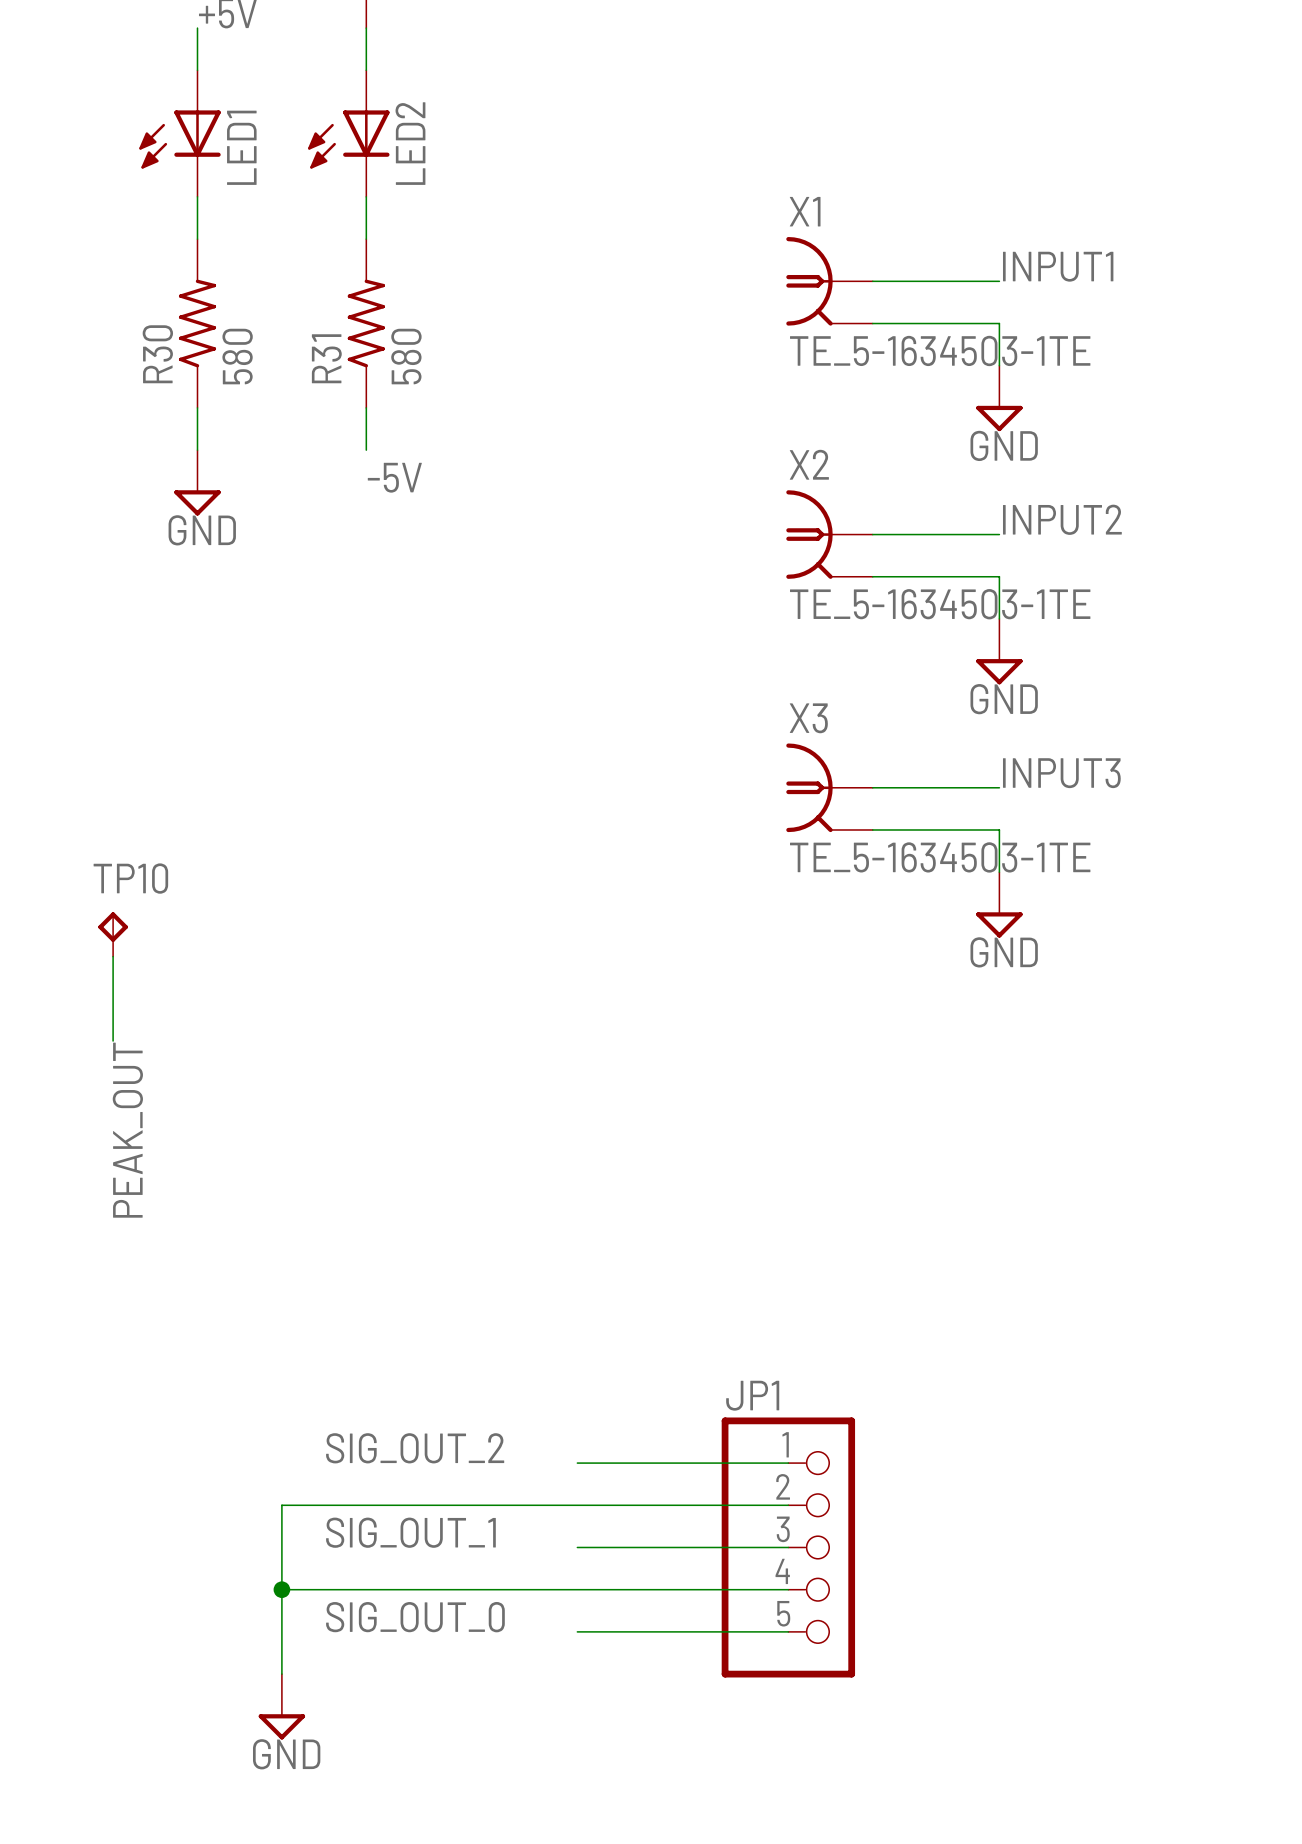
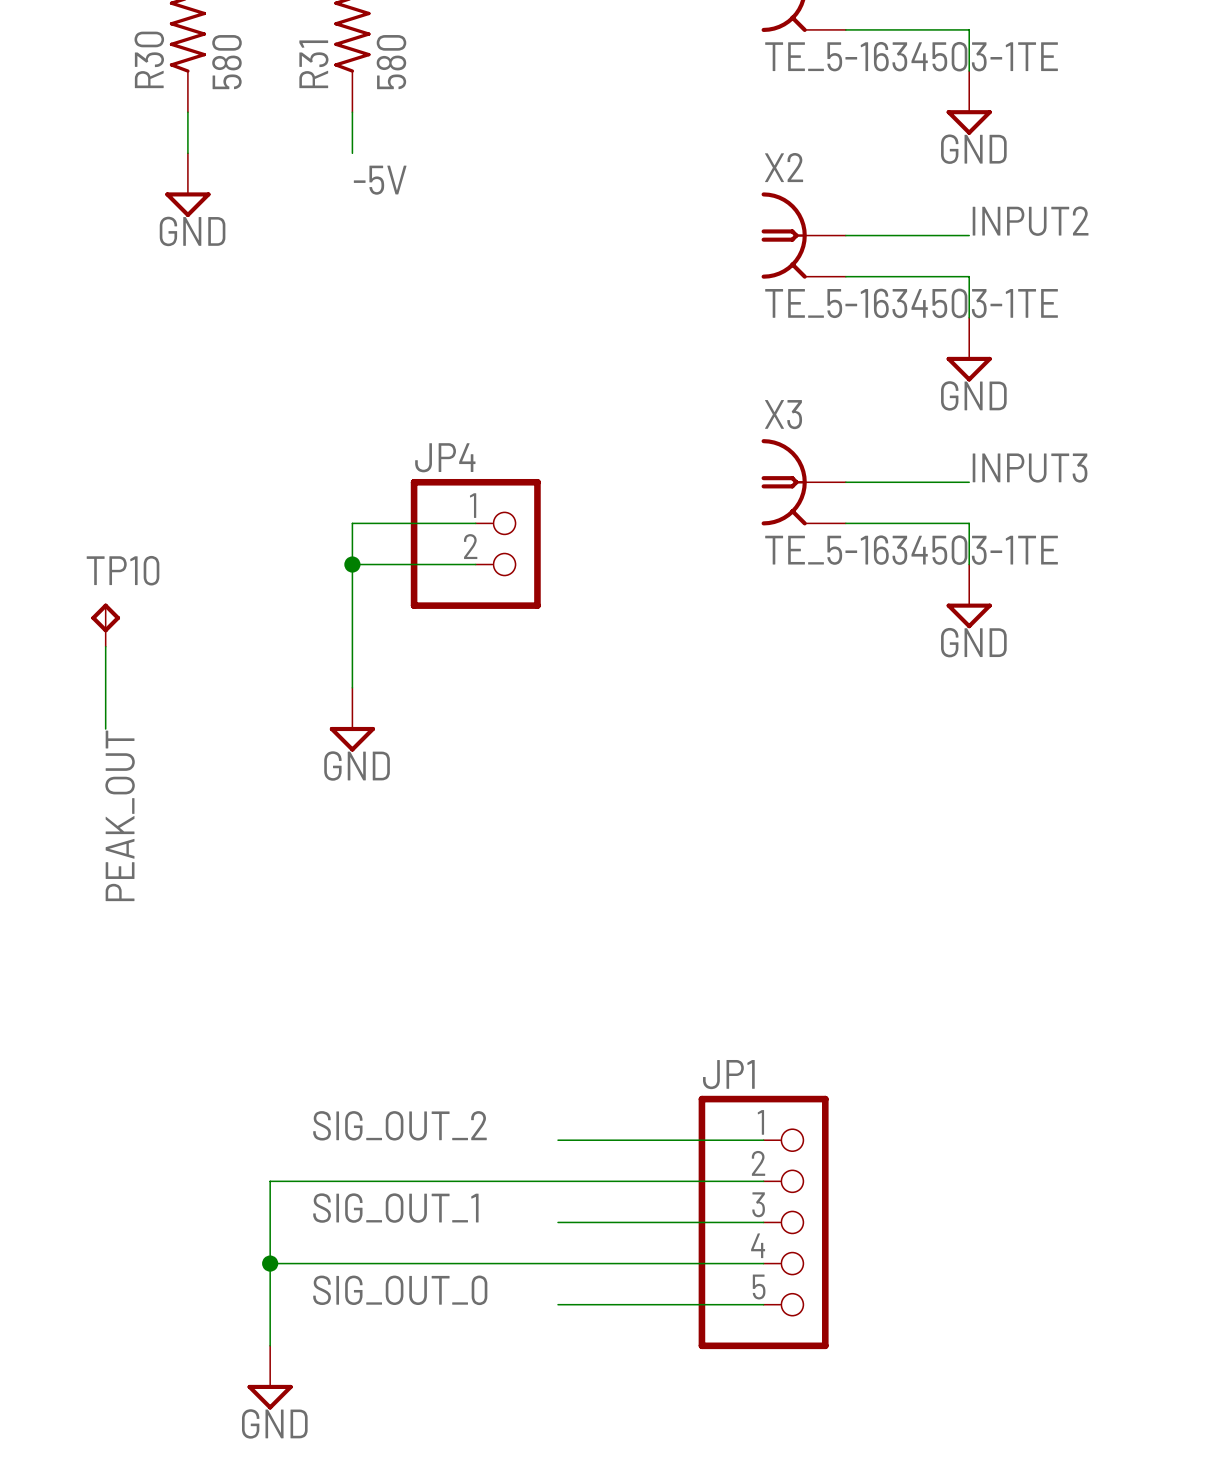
wire: none -> (475, 523) (352, 523) (352, 687)
JP4: none -> (475, 543)
wire: none -> (352, 564) (475, 564)
junction: none -> (352, 564)
power symbol: none -> GND (352, 719)

